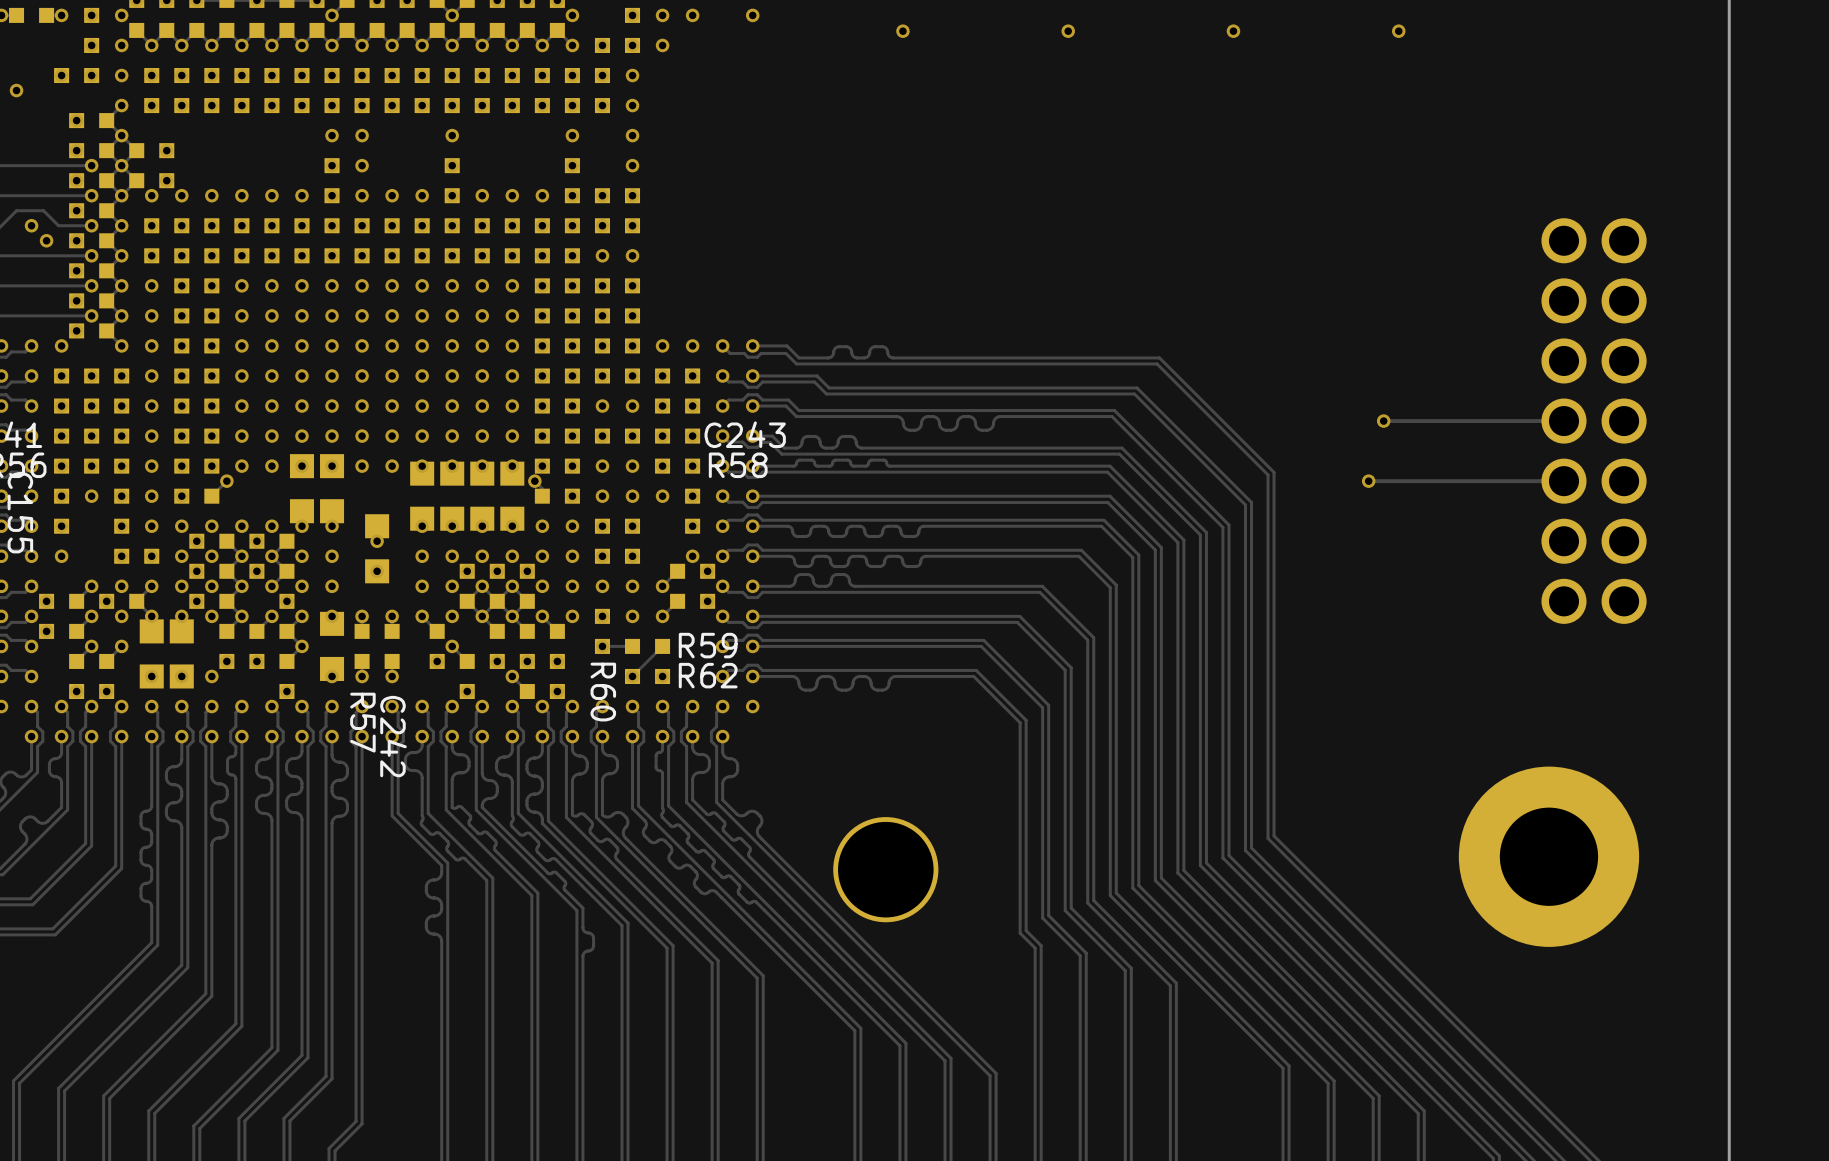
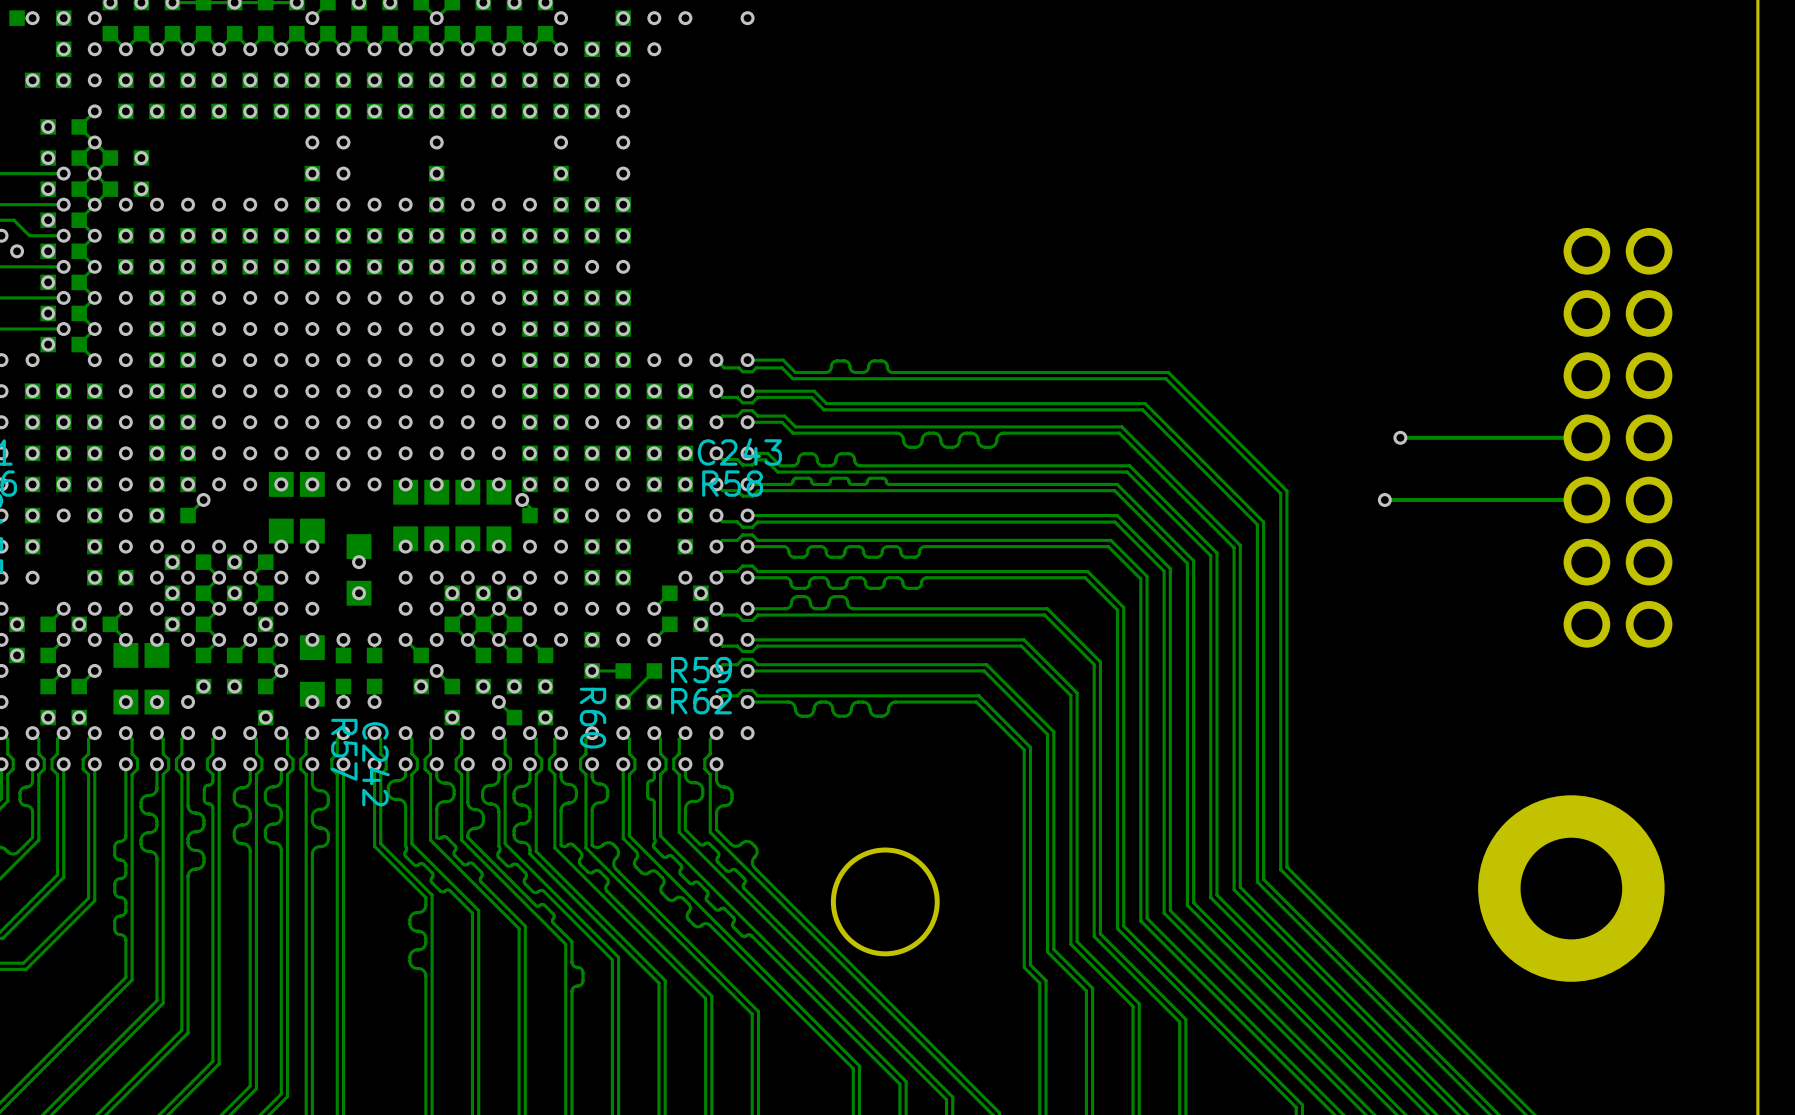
via: (902, 31) -> none
via: (1068, 31) -> none
via: (1233, 31) -> none
via: (1398, 31) -> none

